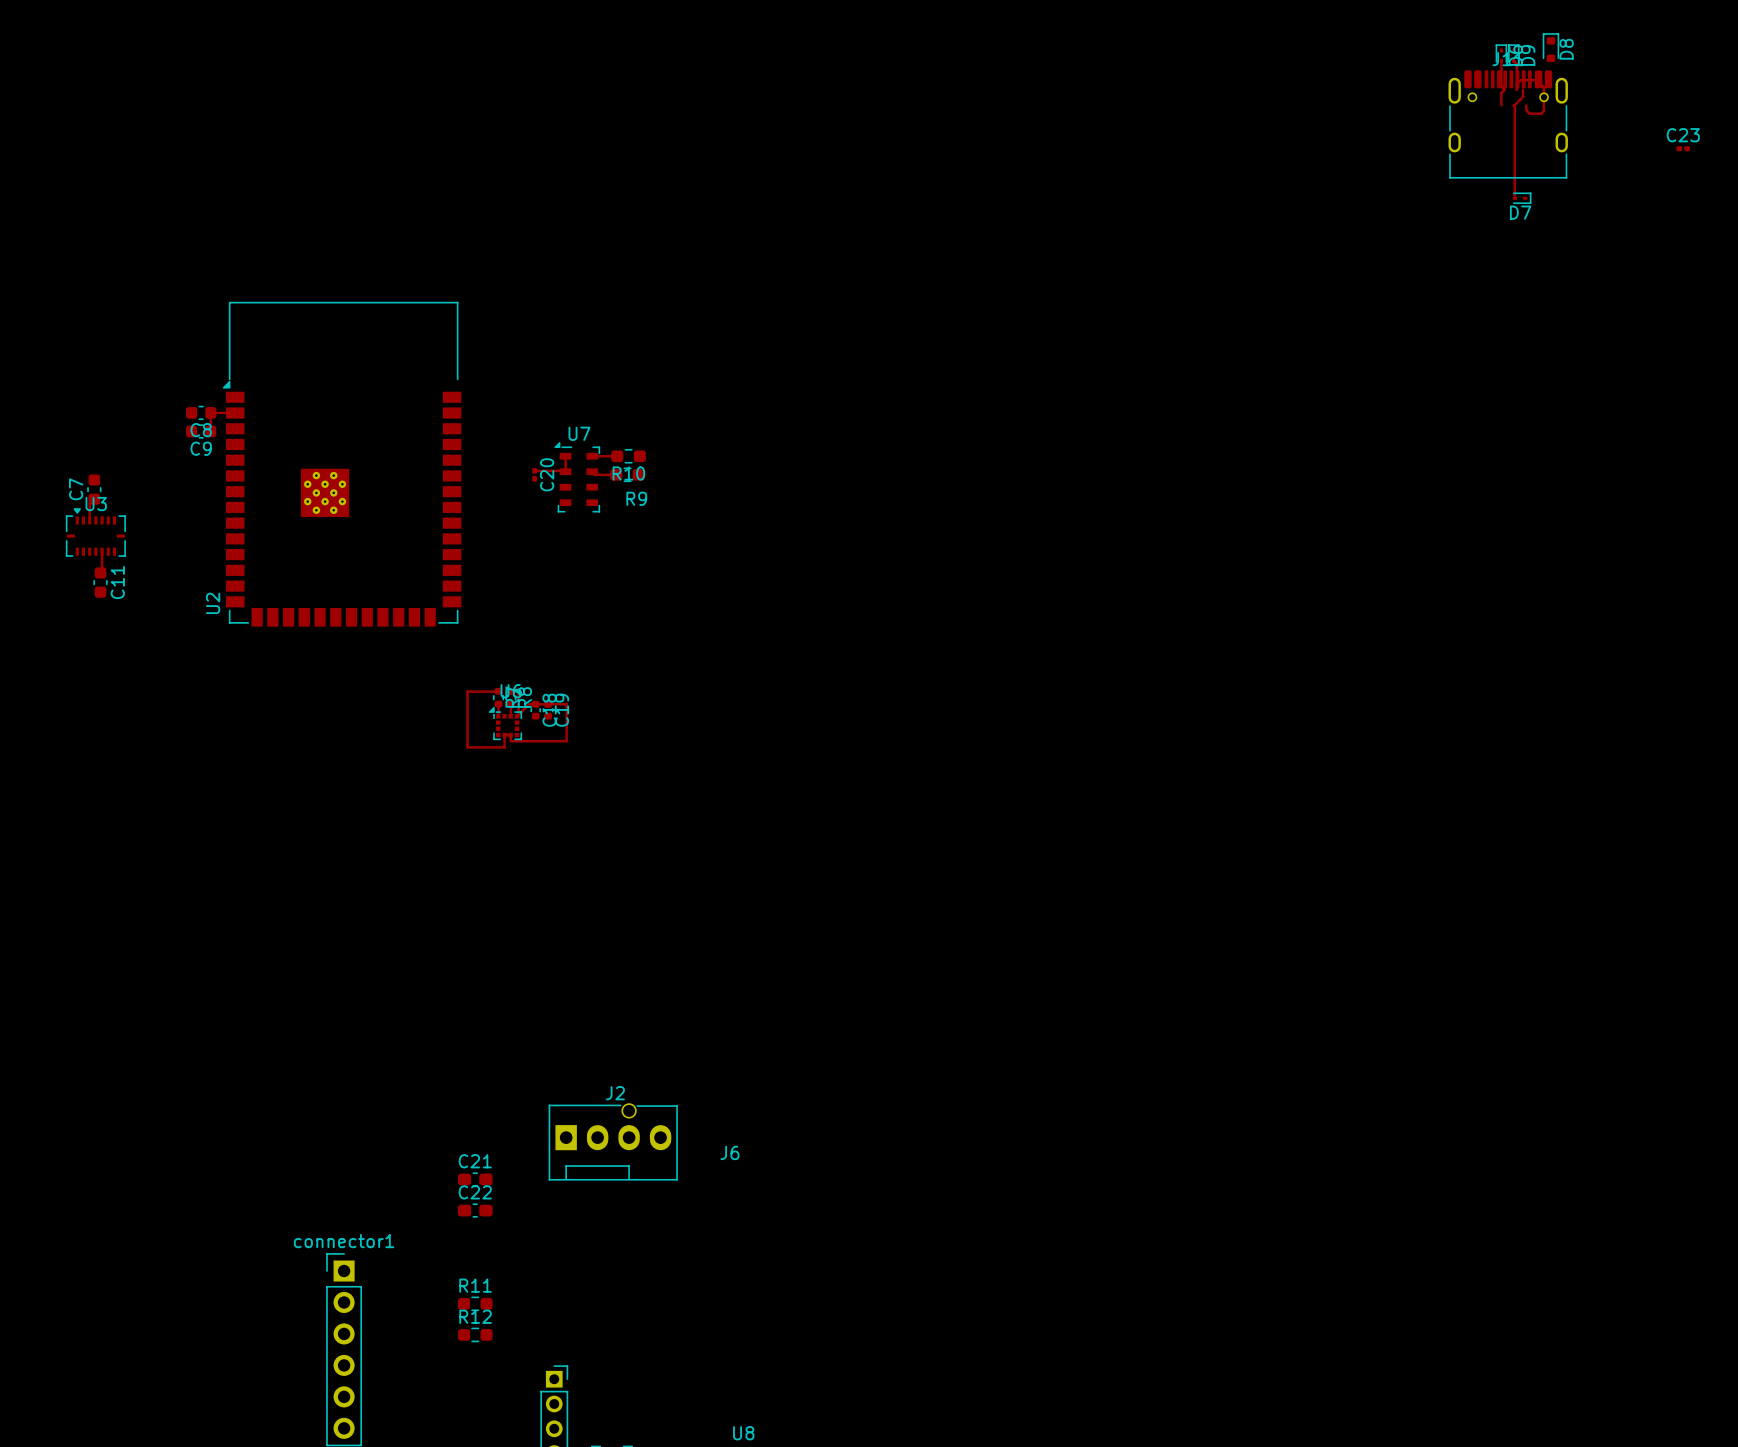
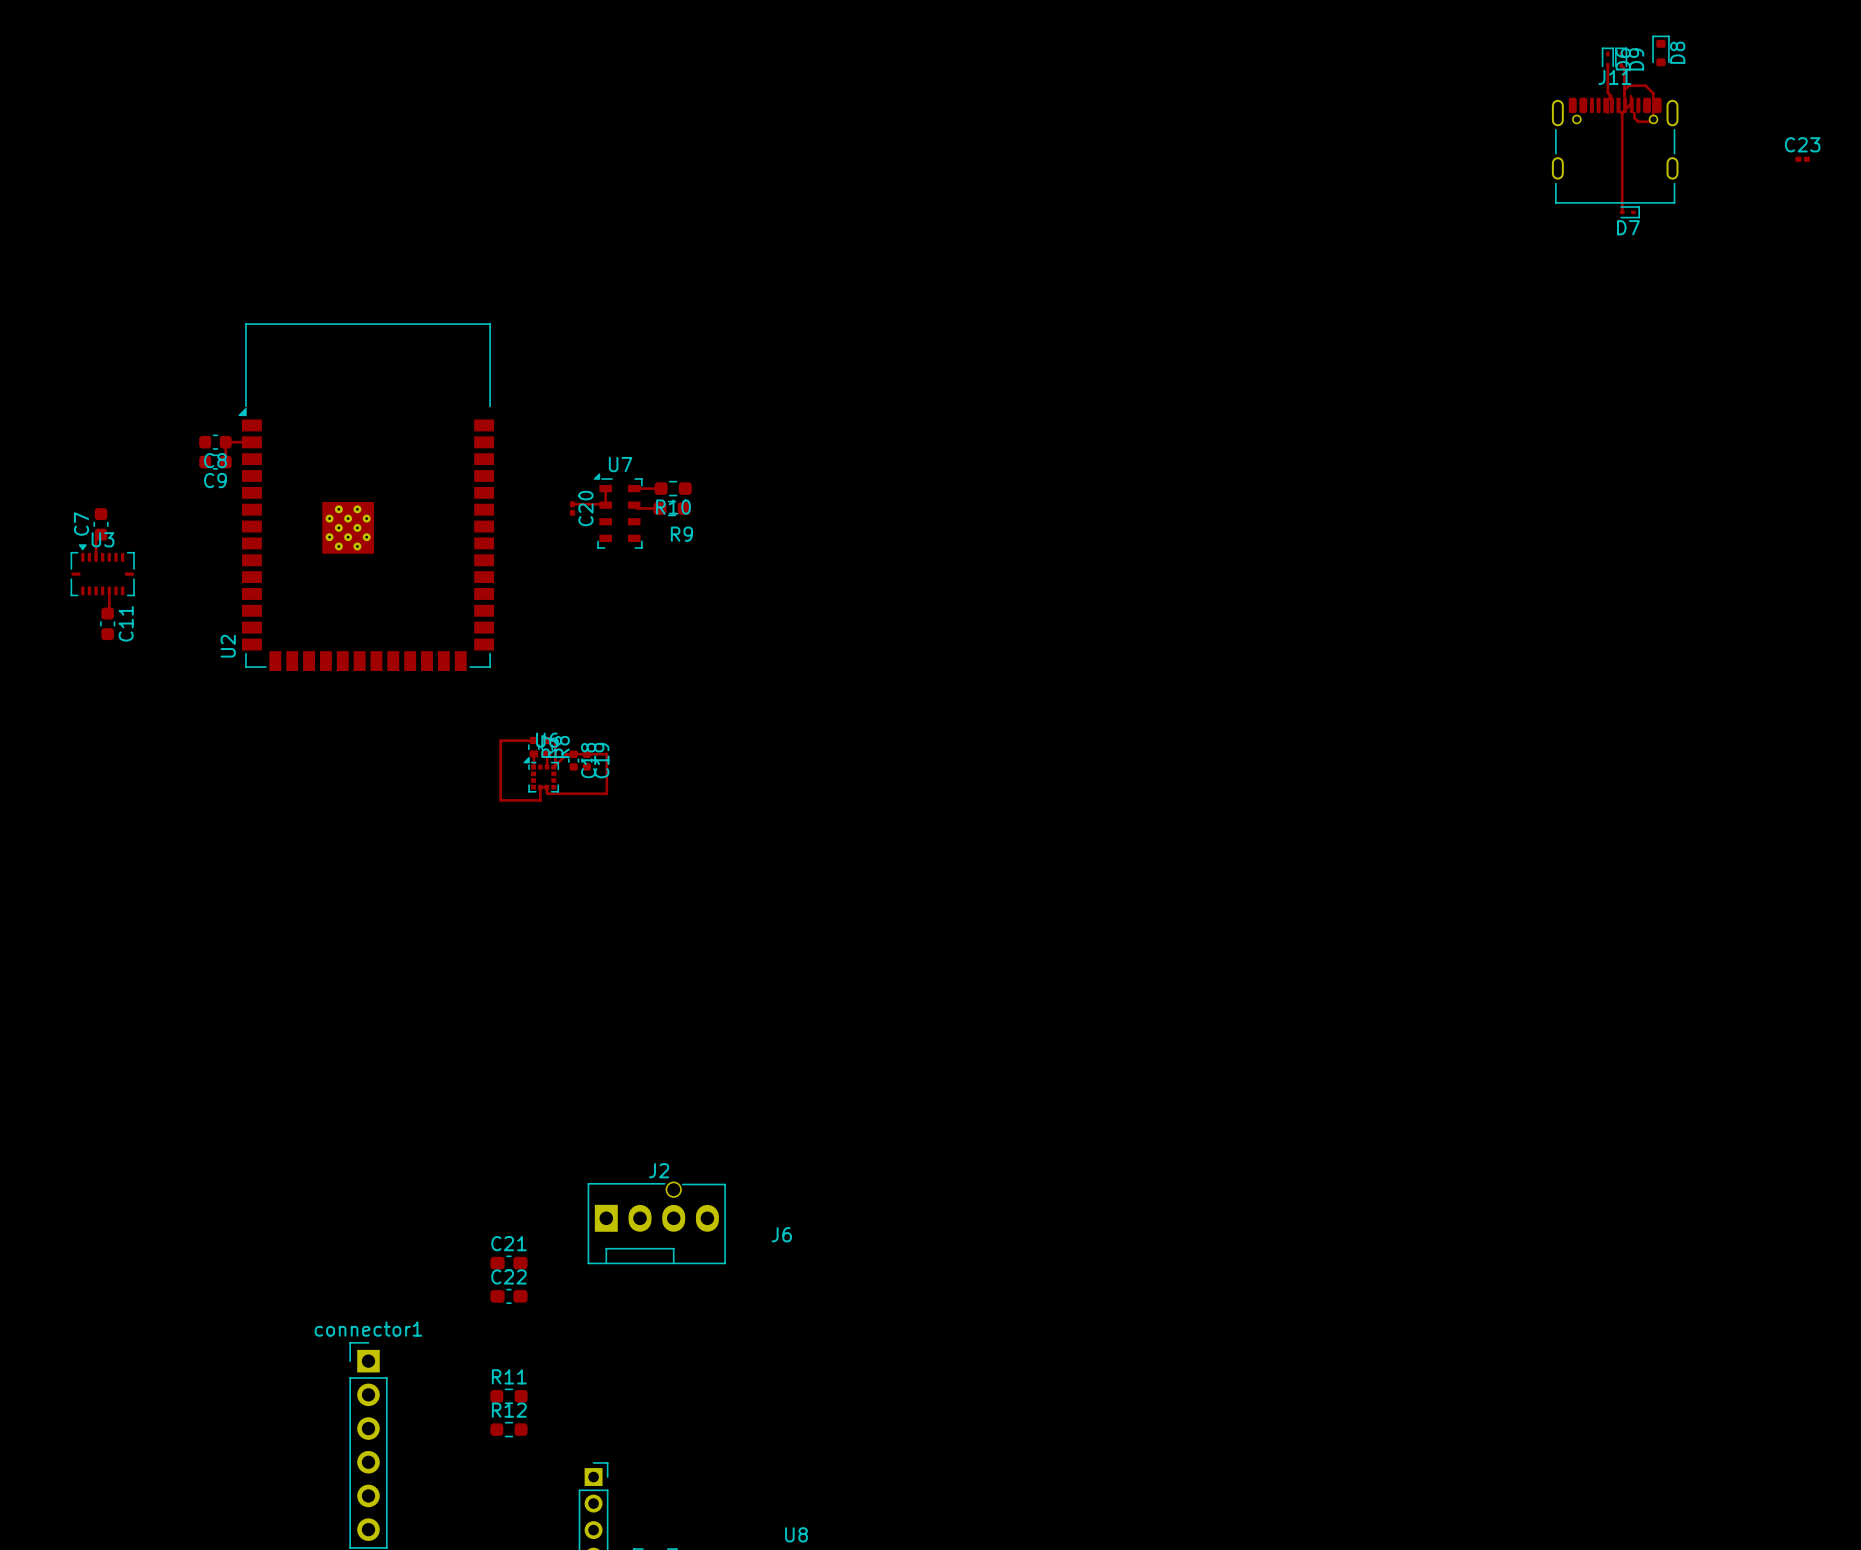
J11 footprint: [1448, 70, 1568, 179] -> [1551, 97, 1679, 204]

